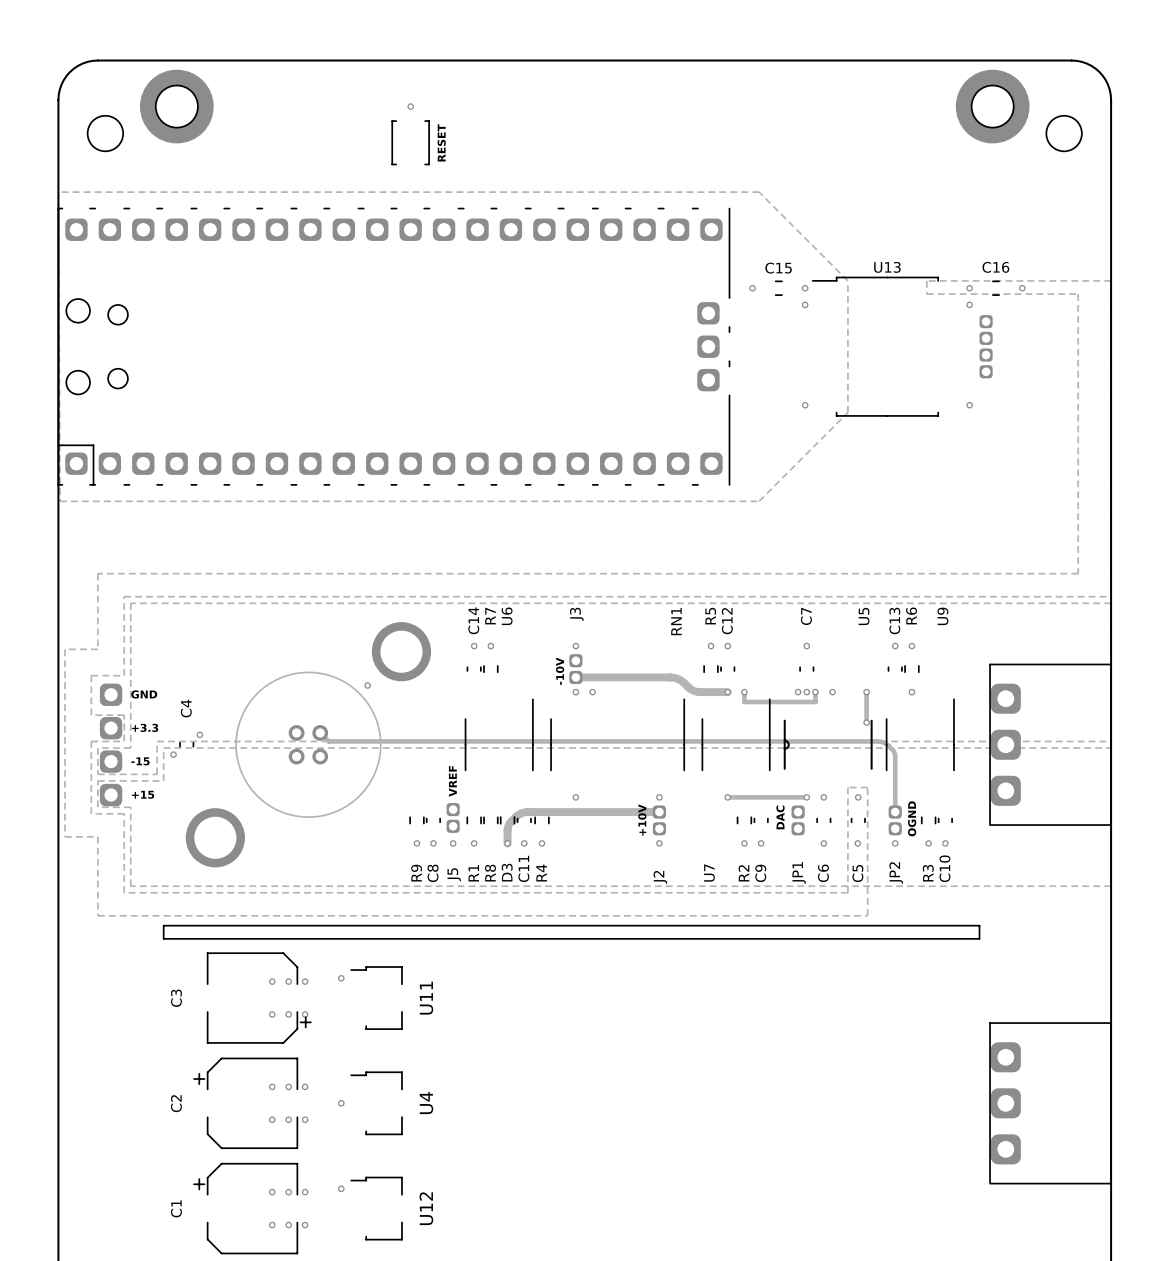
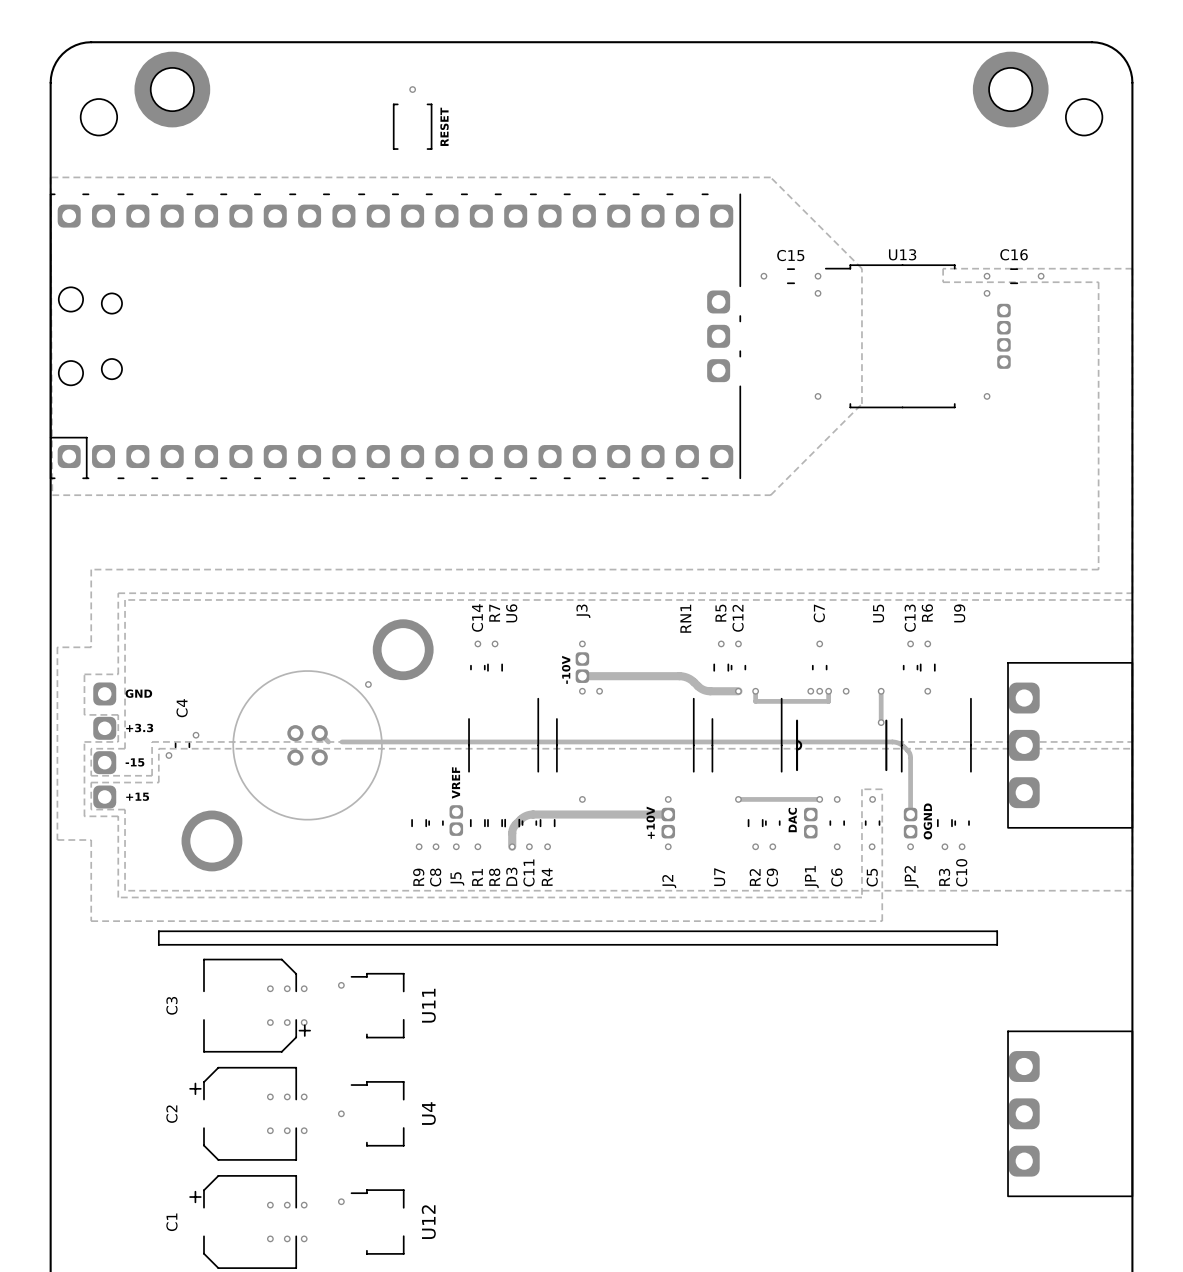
track: (328, 741) (341, 741) -> none

